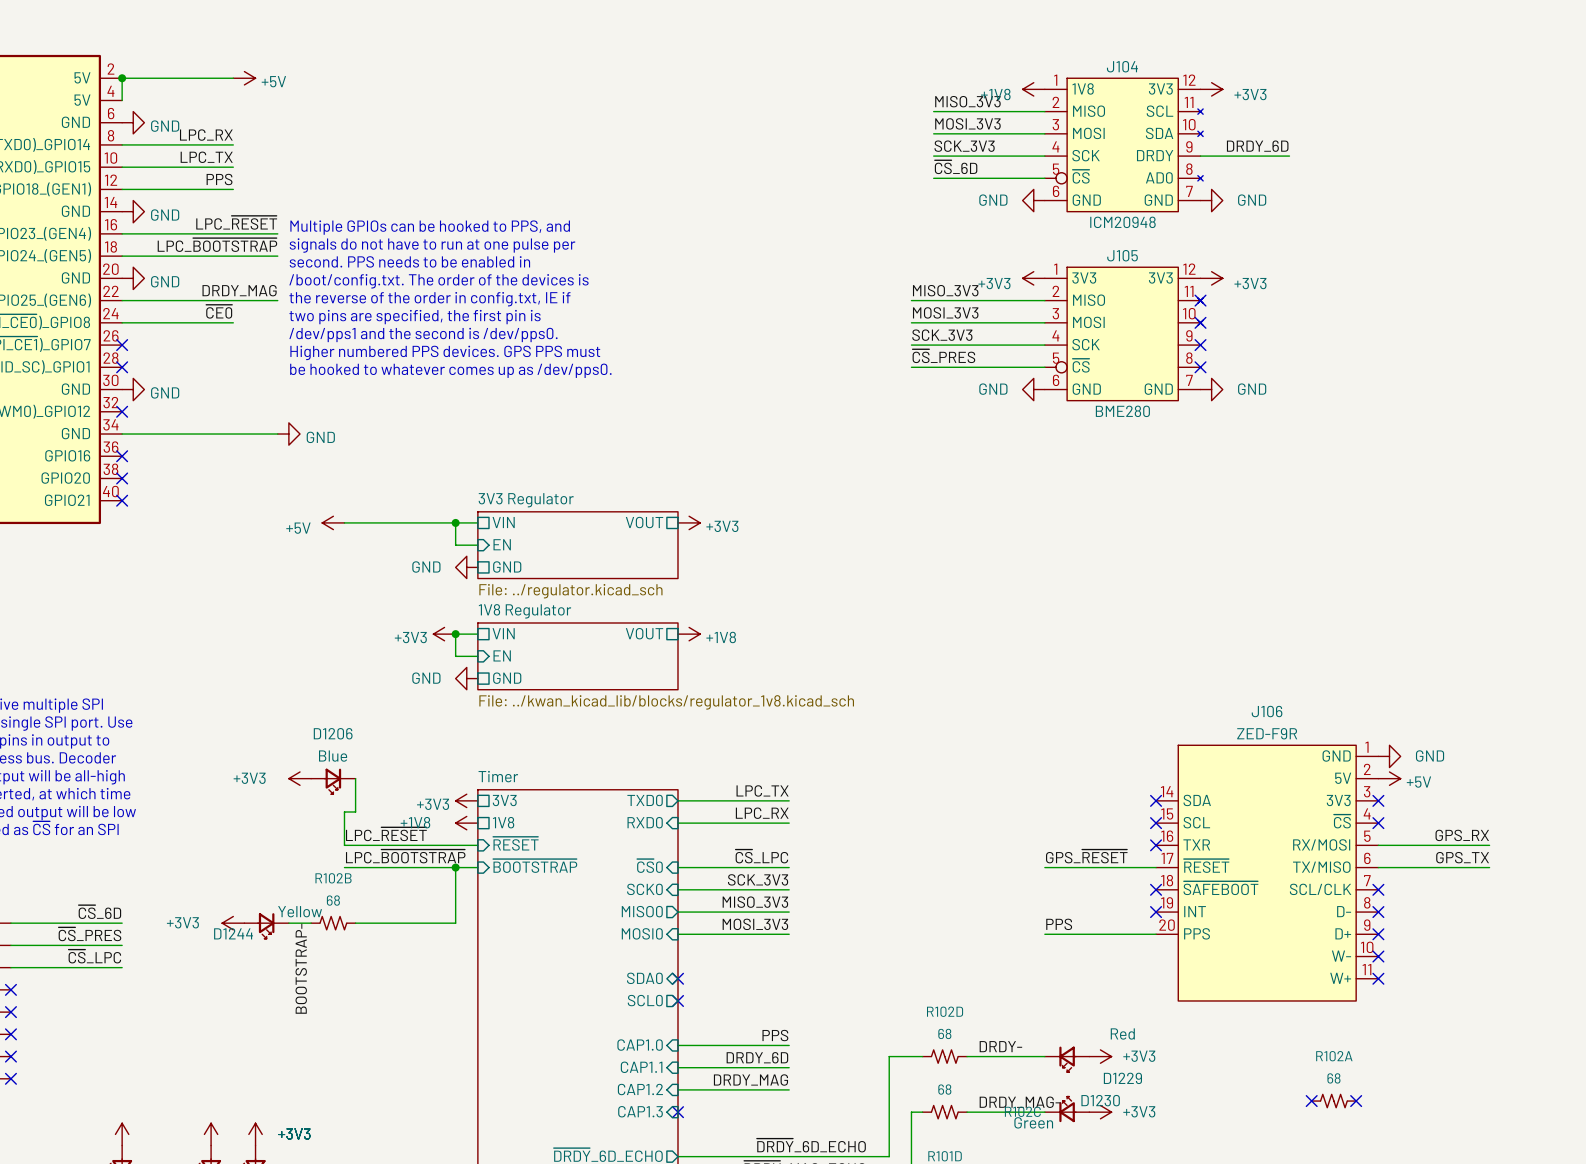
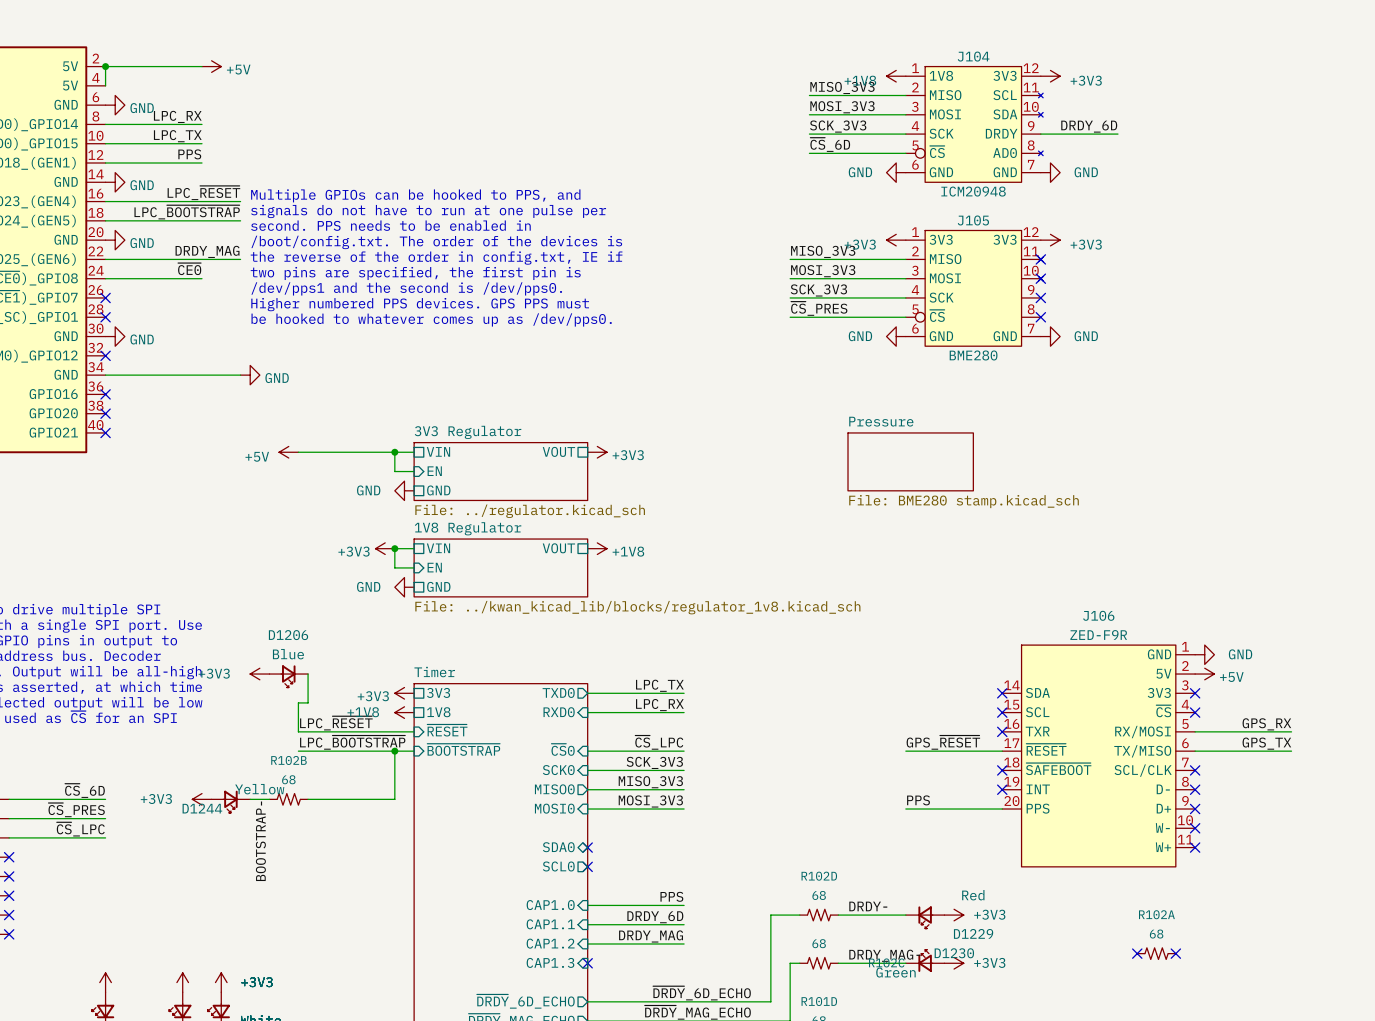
sheet Pressure: none -> File: BME280 stamp.kicad_sch (910, 461)

